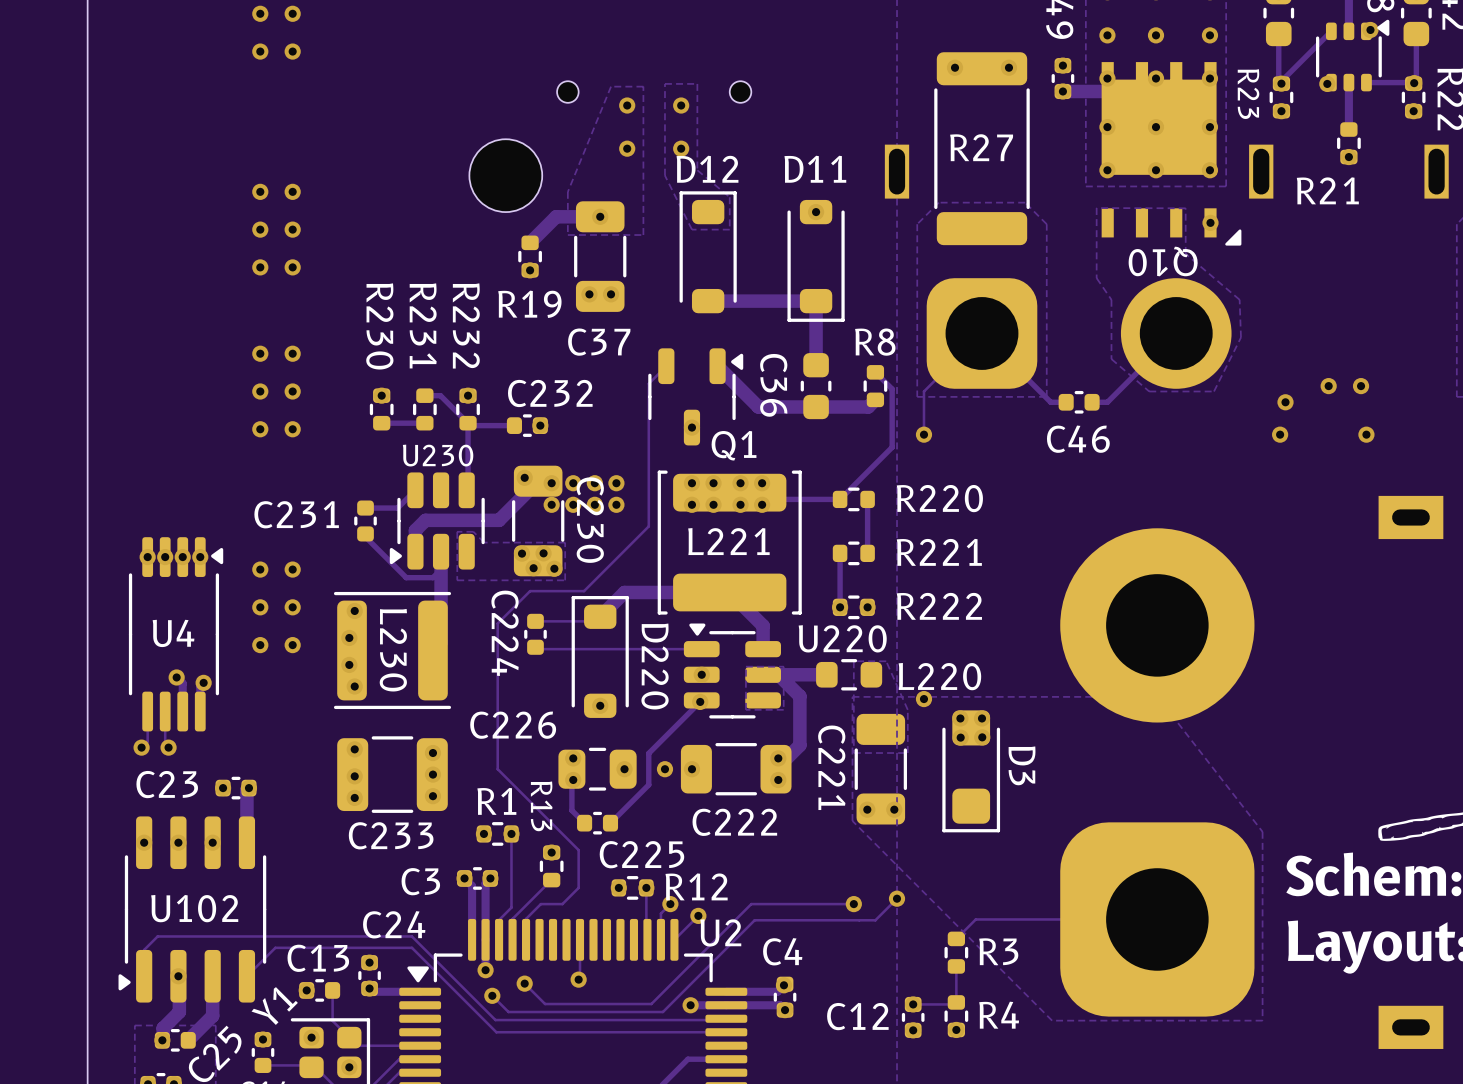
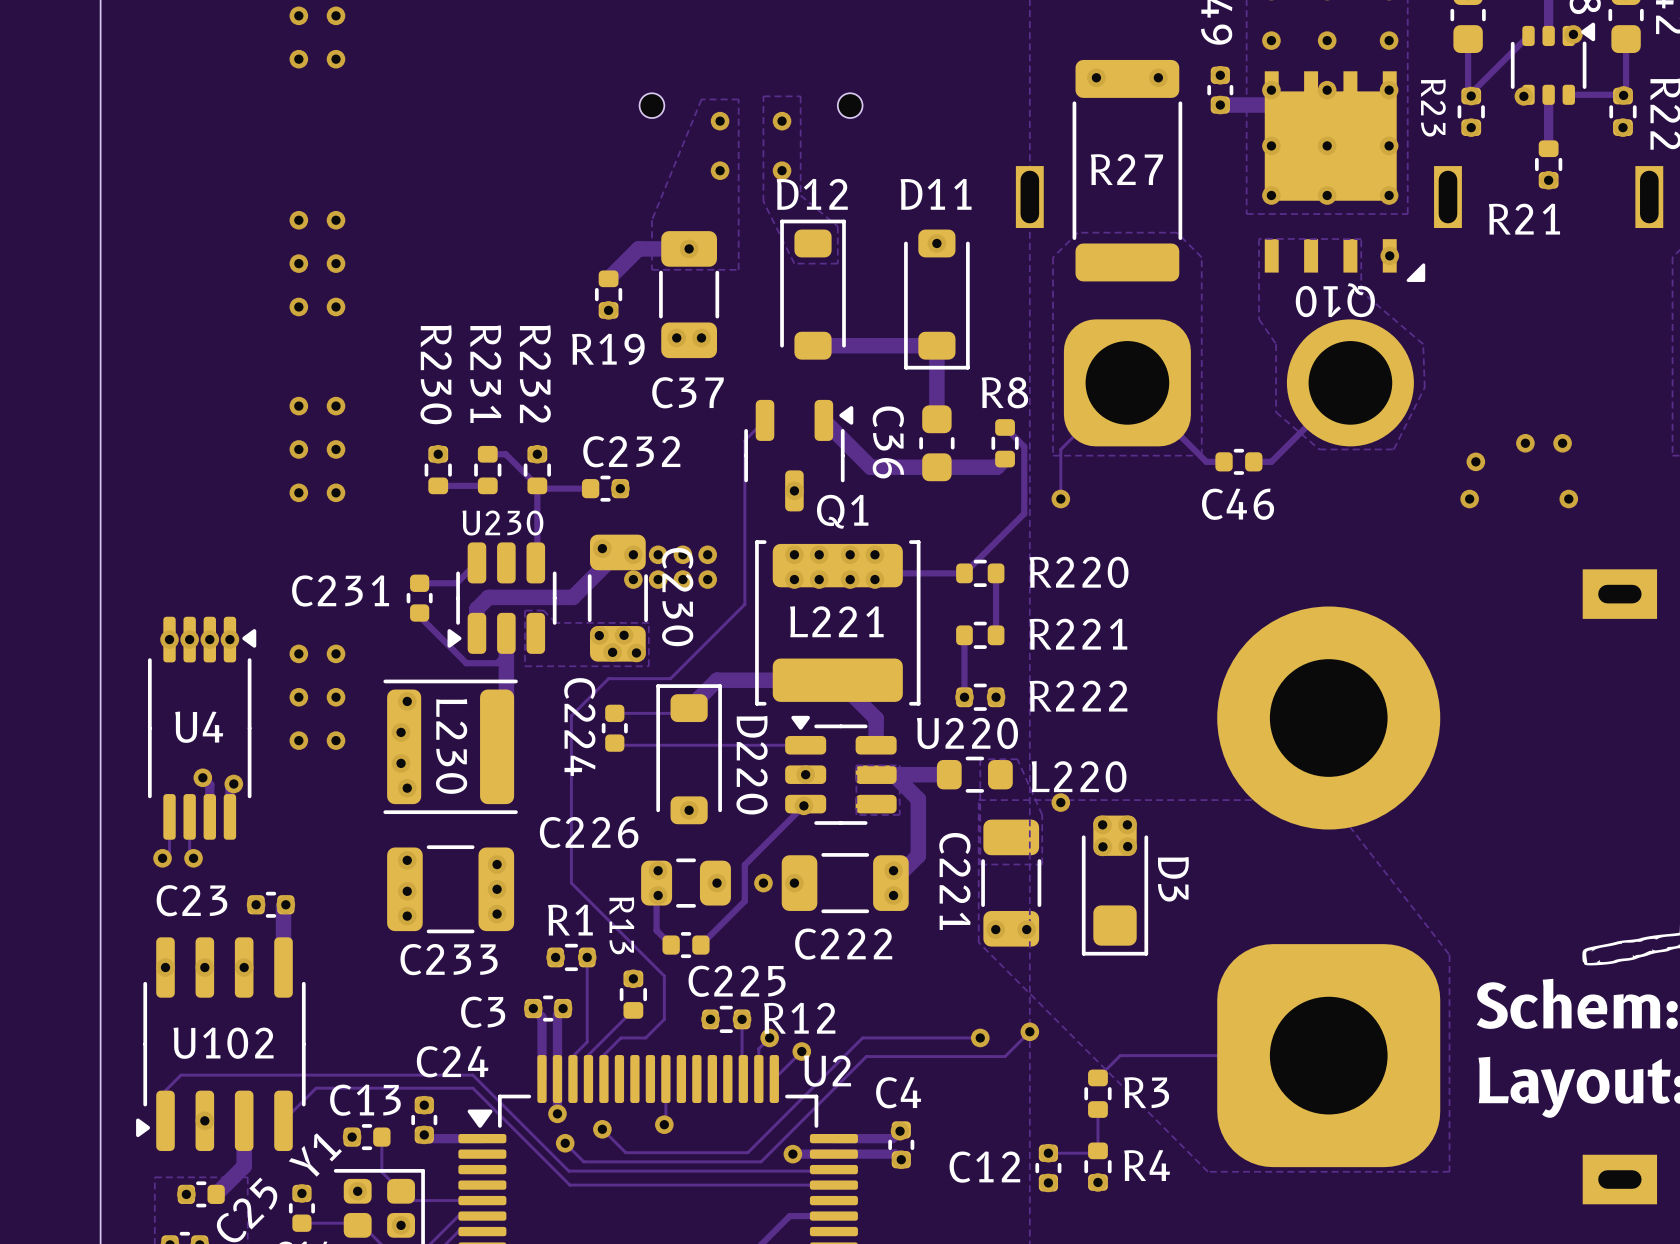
part: (505, 175) -> none
track: (178, 976) (179, 1012) (163, 1028) (163, 1038) -> none

